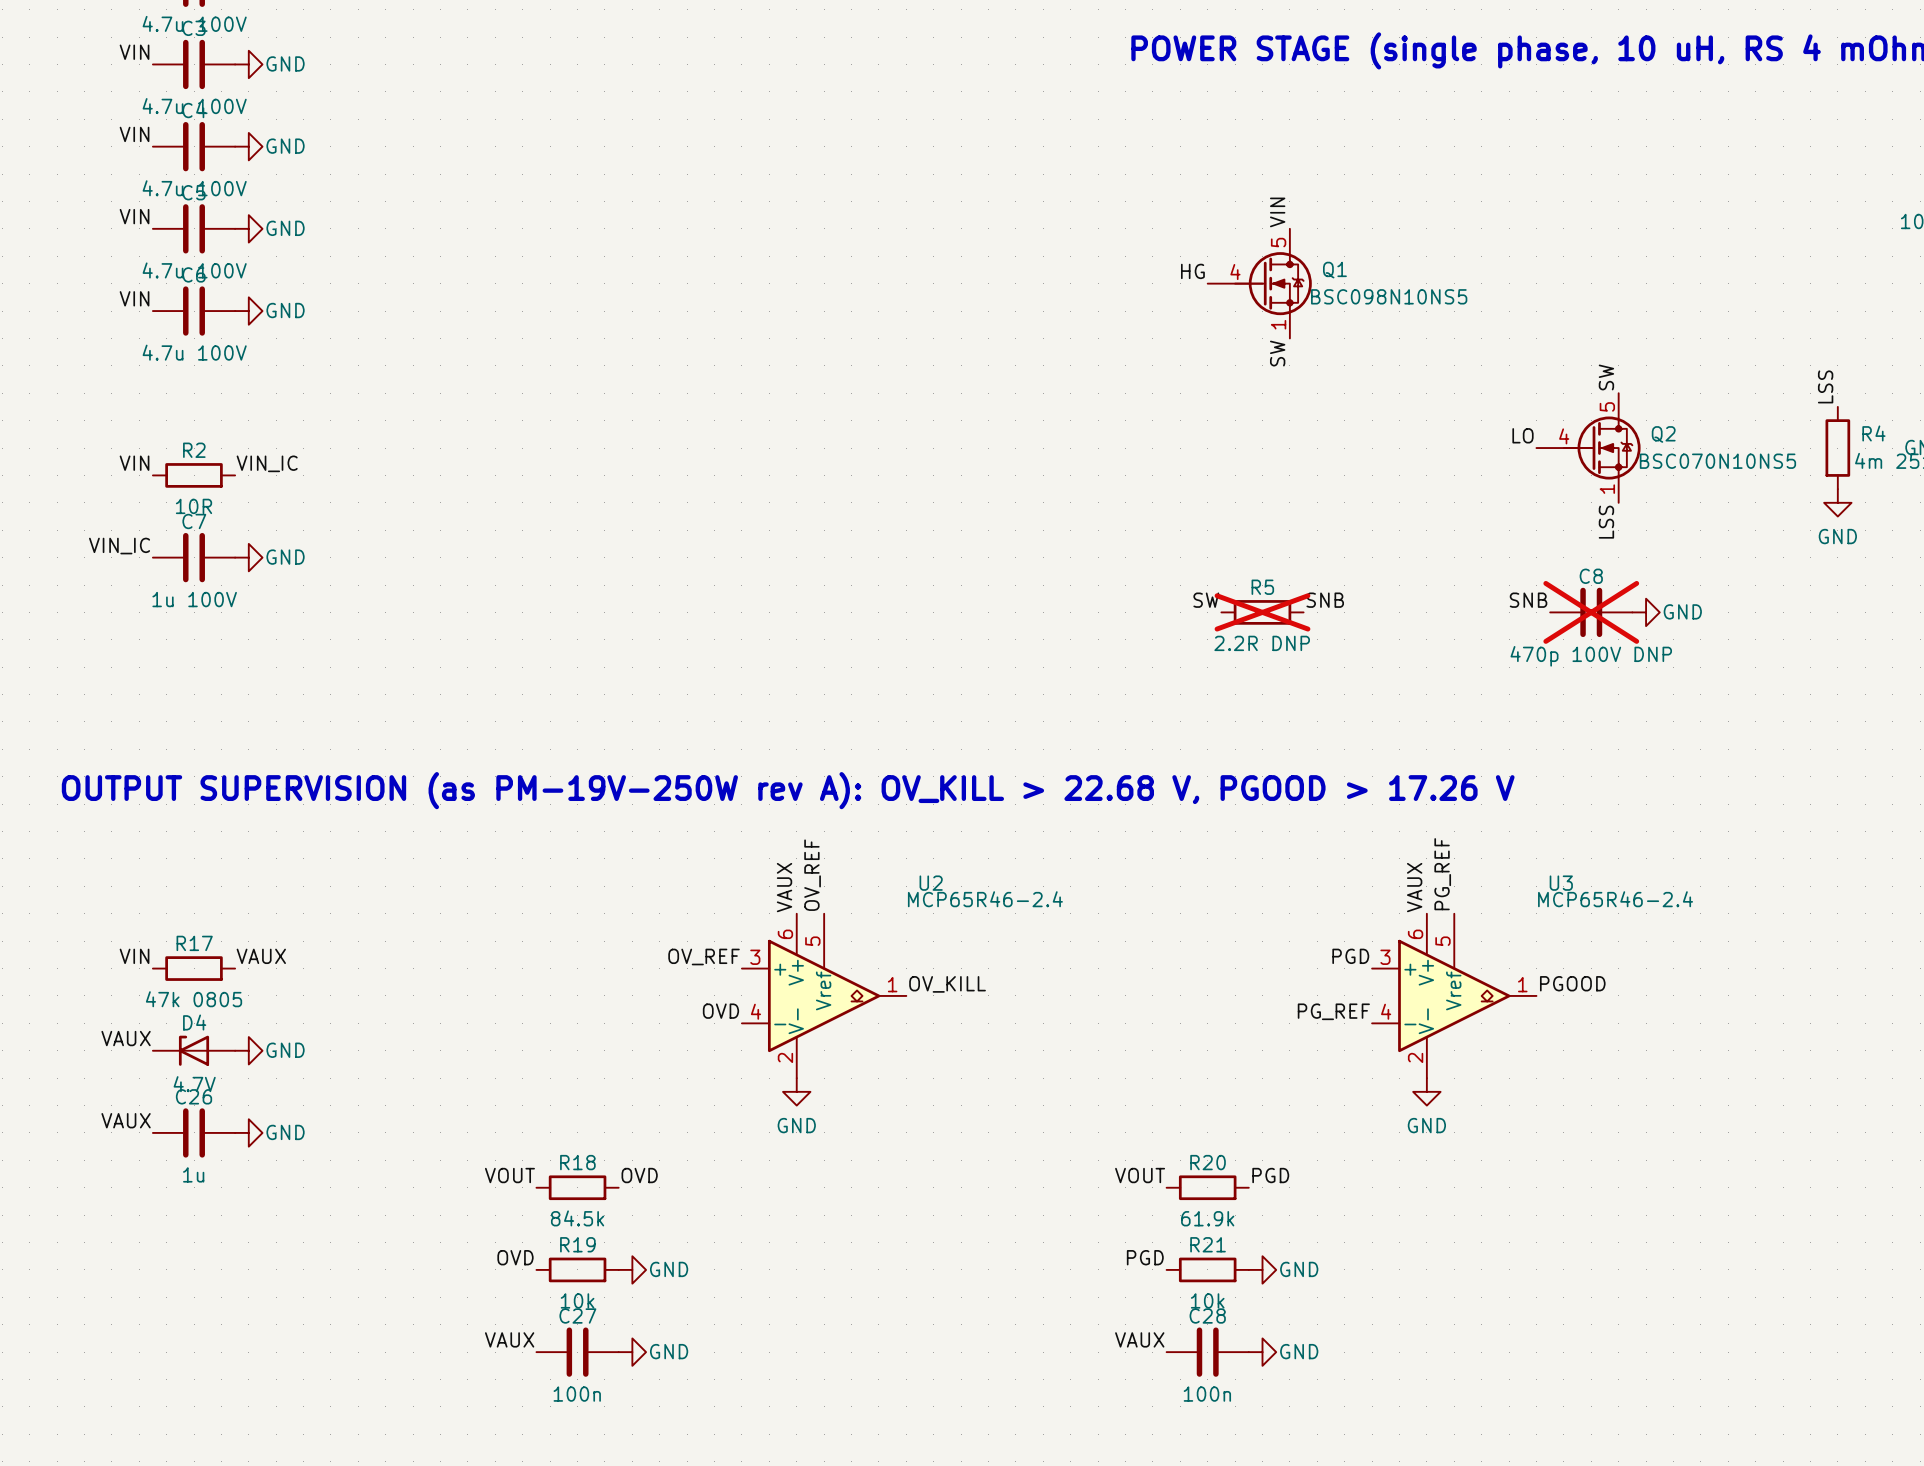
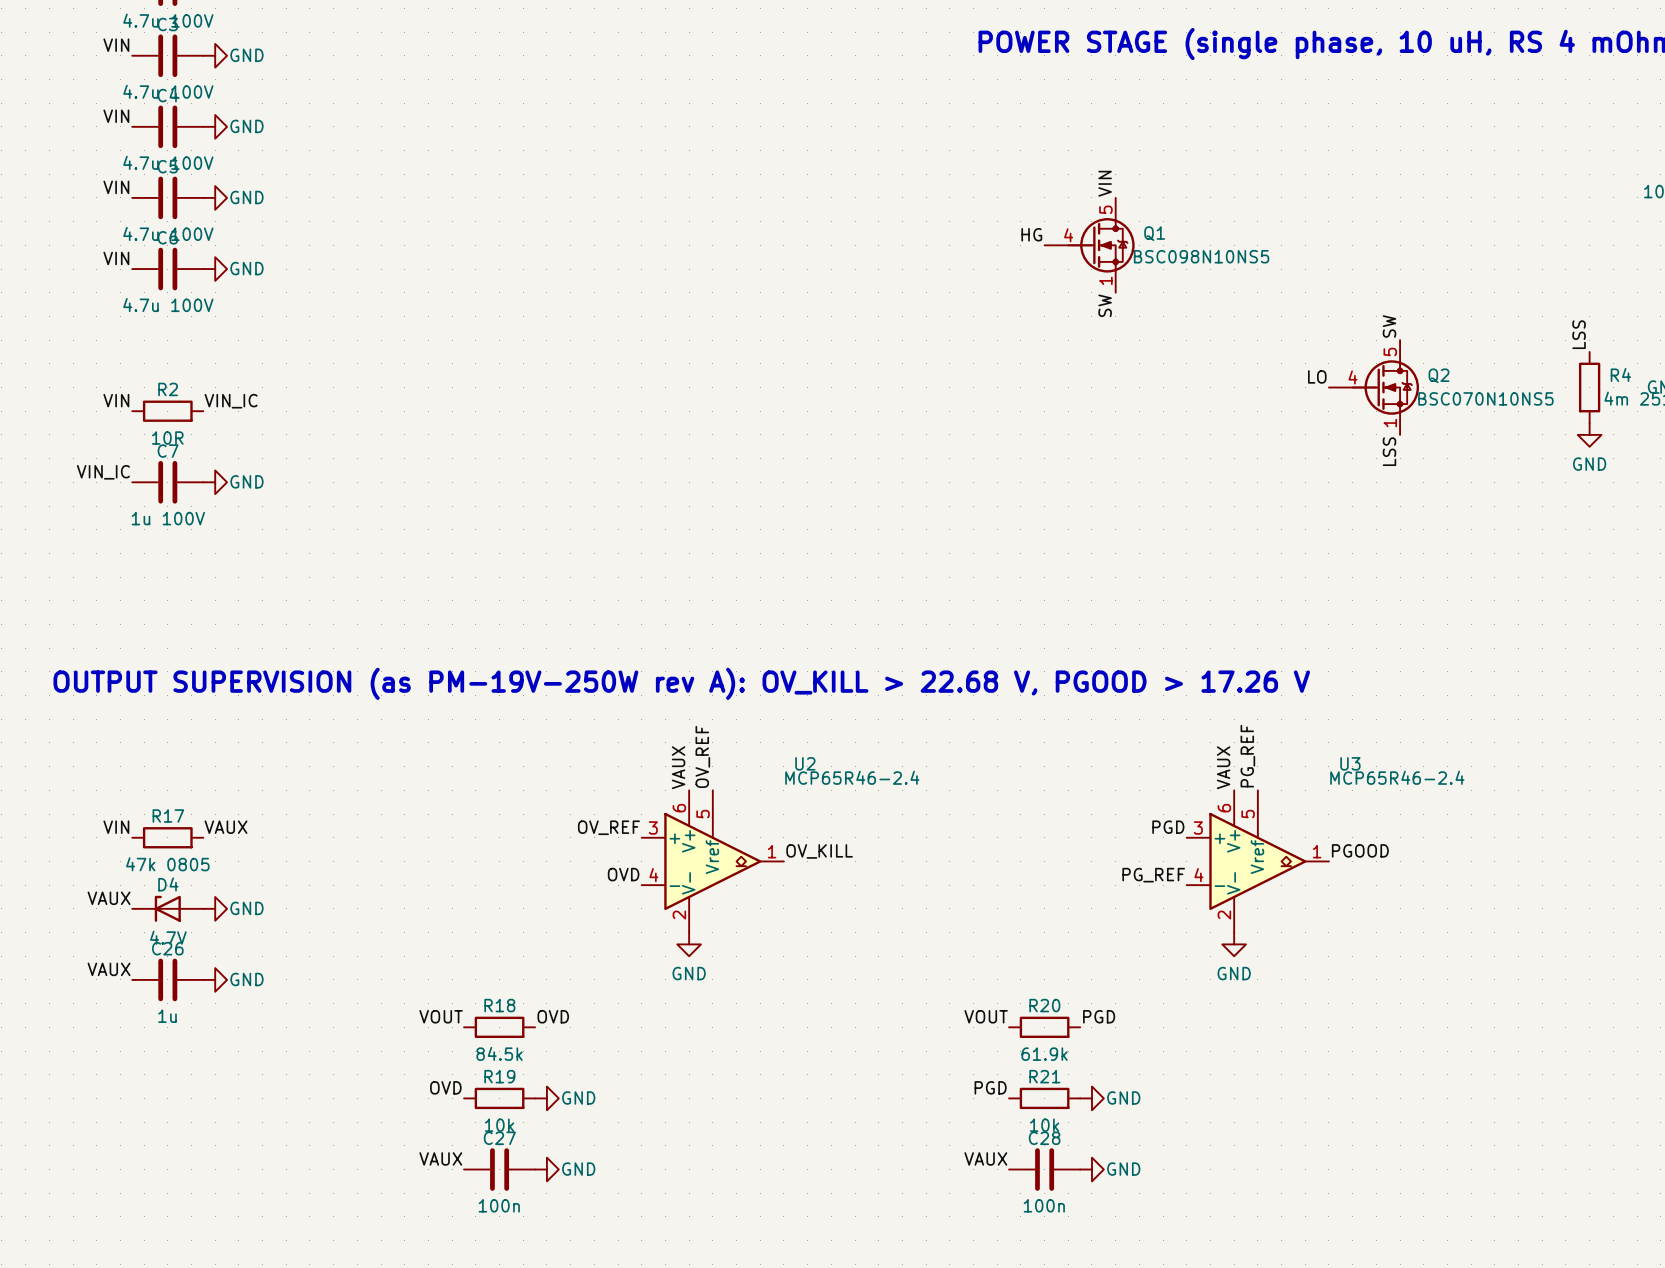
label: SW (1206, 600) -> none
label: SNB (1325, 600) -> none
label: SNB (1528, 600) -> none
R5: 2.2R DNP (1262, 612) -> none
C8: 470p 100V DNP (1591, 612) -> none
power symbol: GND (1646, 612) -> none

